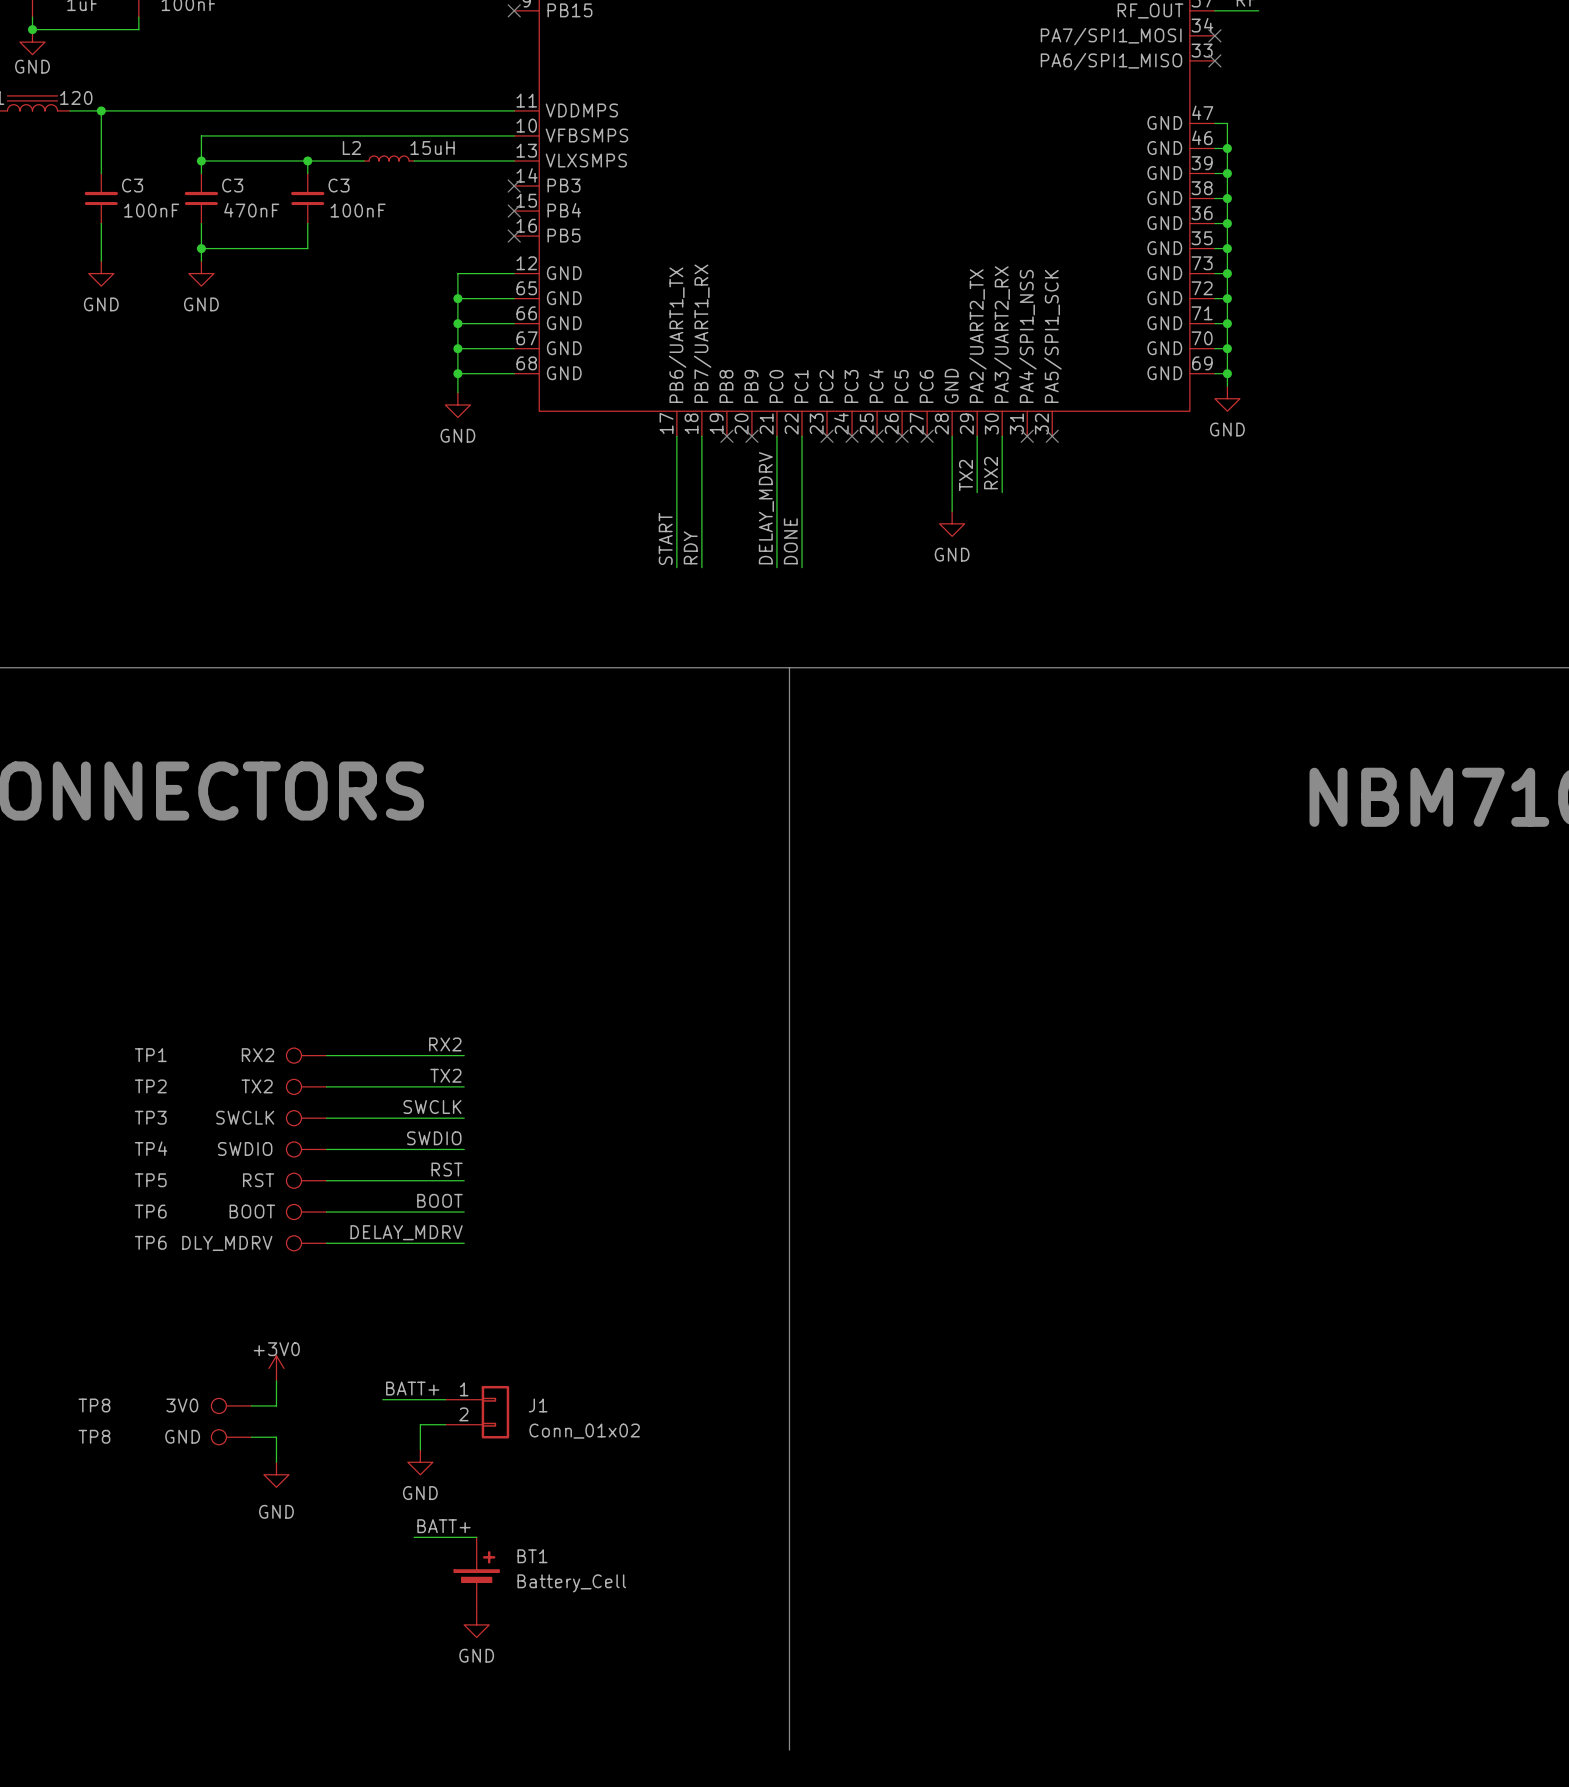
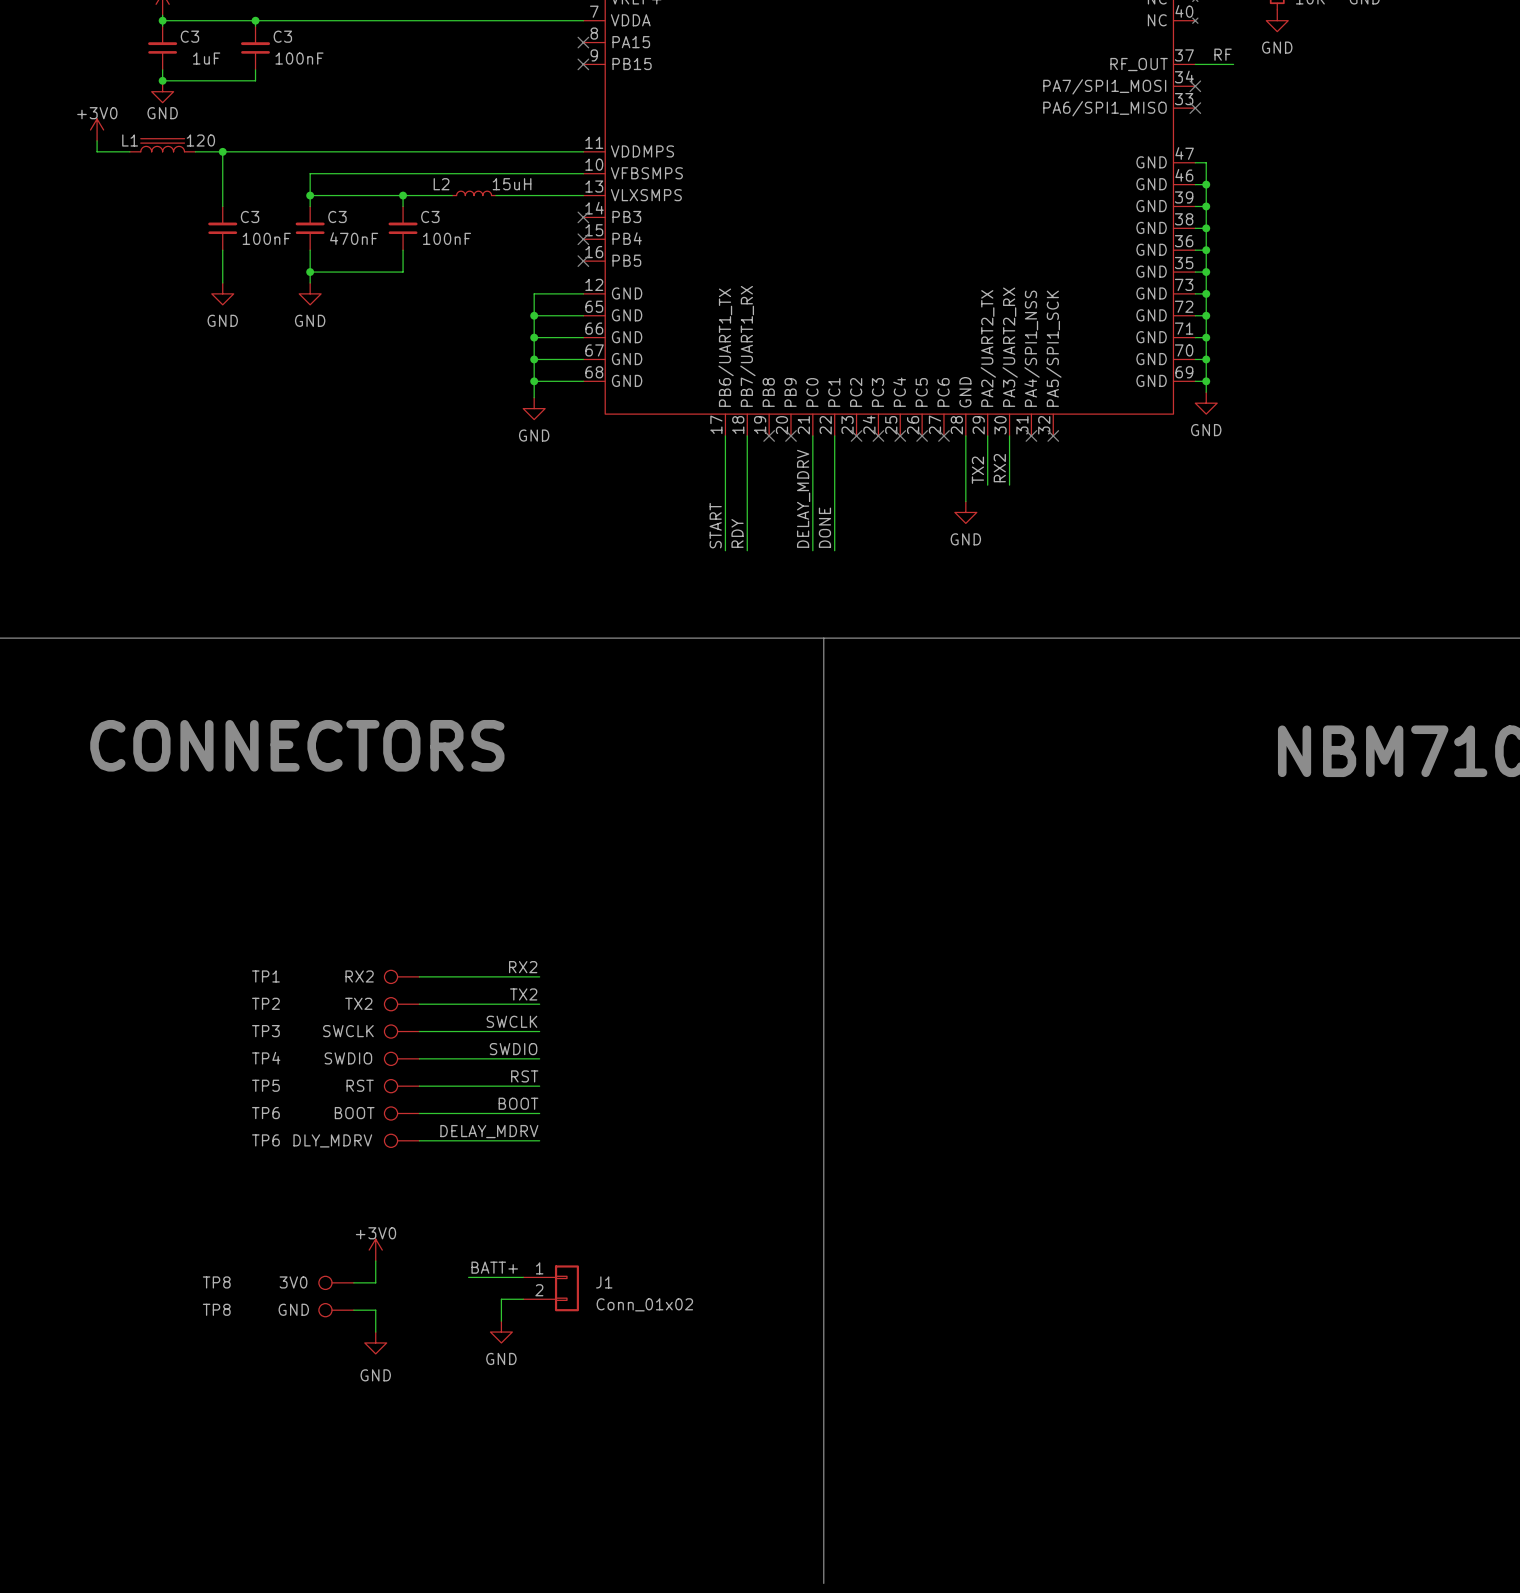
label: BATT+ (444, 1526) -> none
wire: (414, 1537) (476, 1537) -> none
BT1: Battery_Cell (476, 1574) -> none
power symbol: GND (476, 1624) -> none

